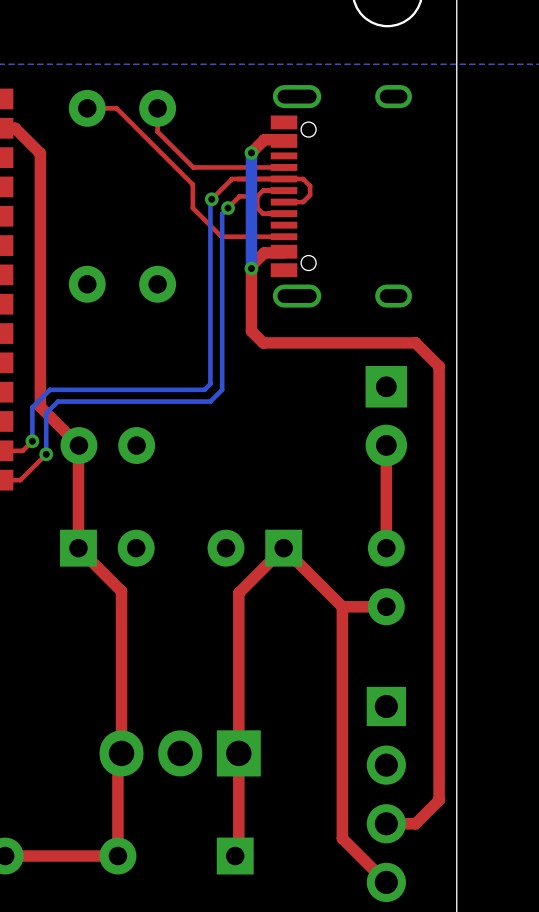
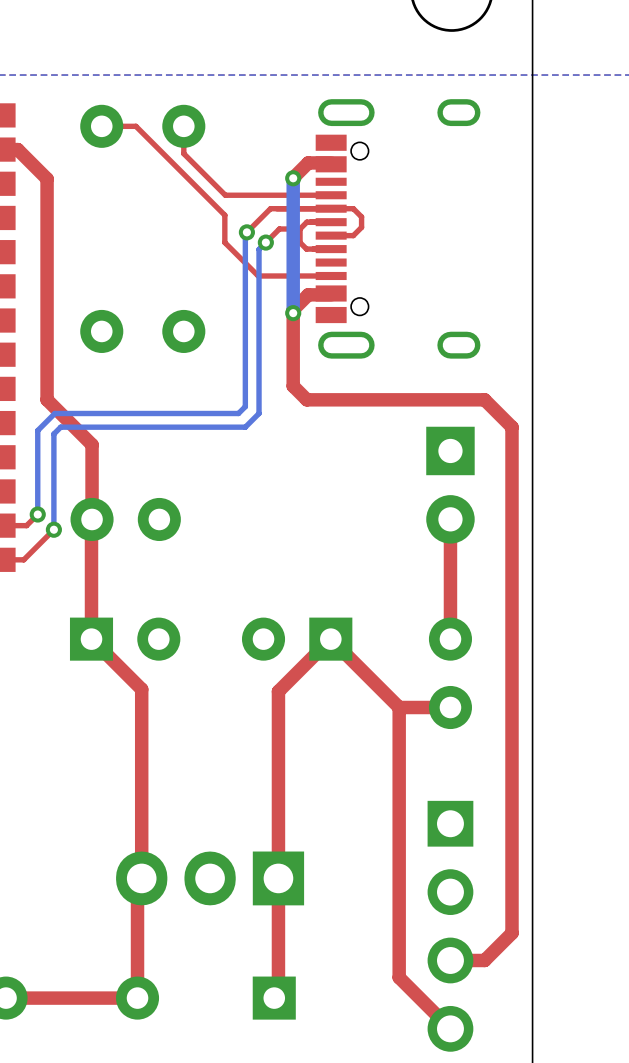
top track: (40, 342) (40, 406) (78, 445) -> (47, 399) (92, 444) (92, 519)
bottom track: (210, 348) (210, 383) (204, 389) (49, 389) (32, 407) -> (245, 406) (238, 413) (54, 413) (37, 430) (37, 475)
bottom track: (222, 354) (222, 389) (210, 401) (57, 401) (46, 413) -> (259, 413) (245, 427) (60, 427) (53, 434) (53, 481)

